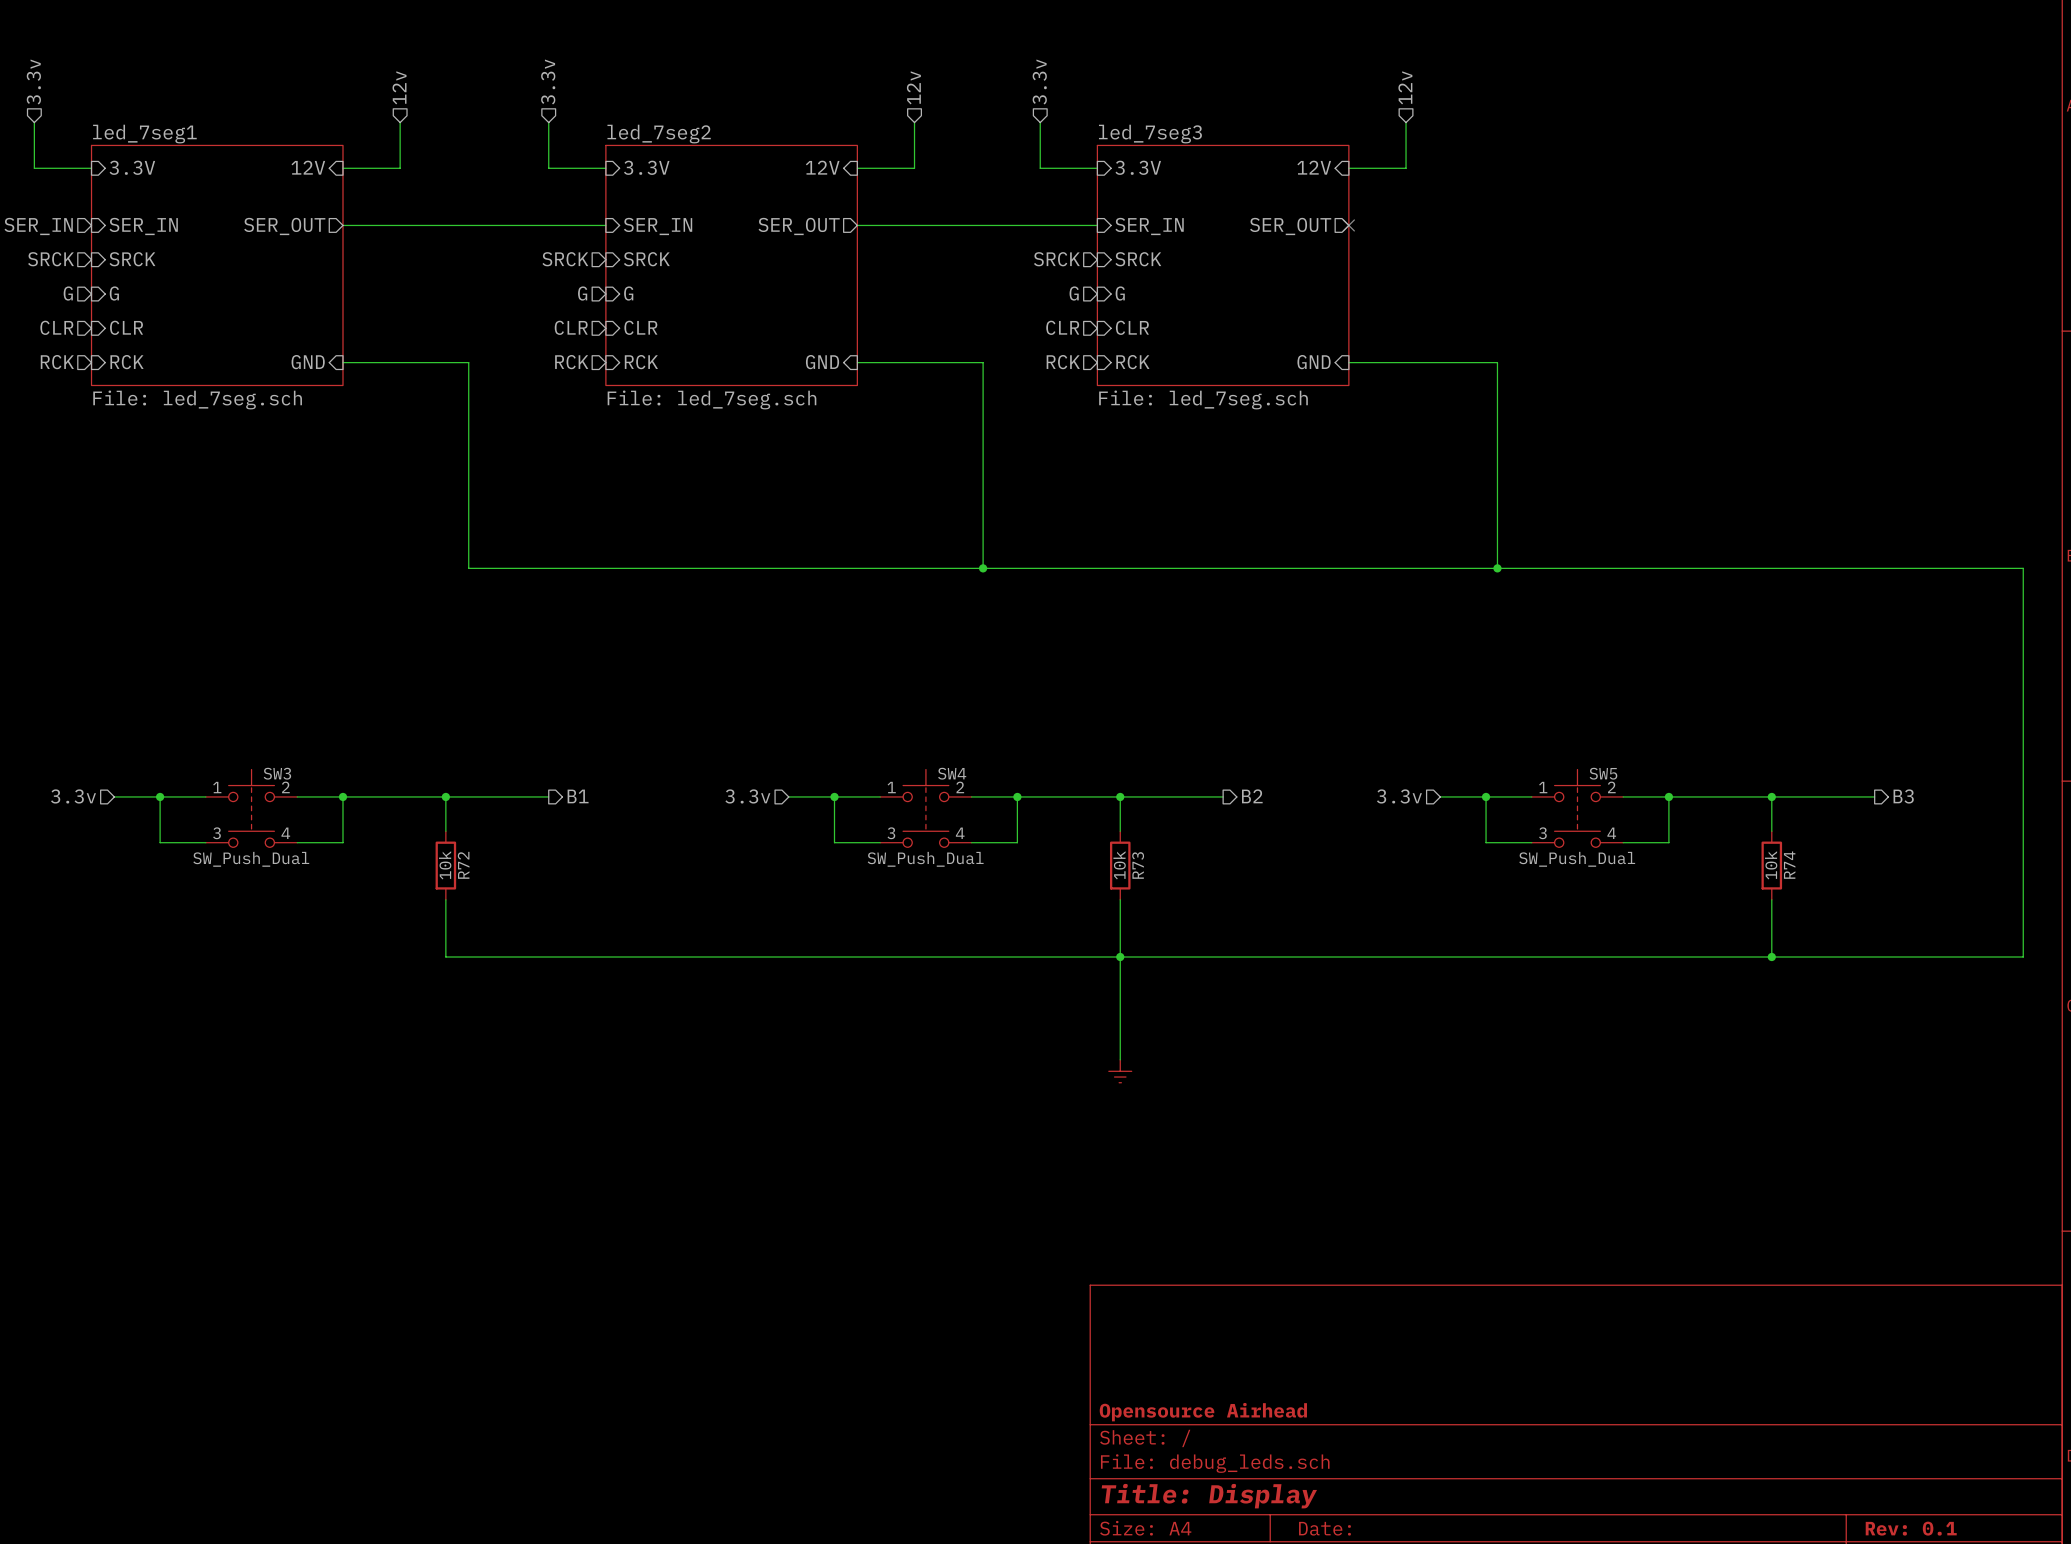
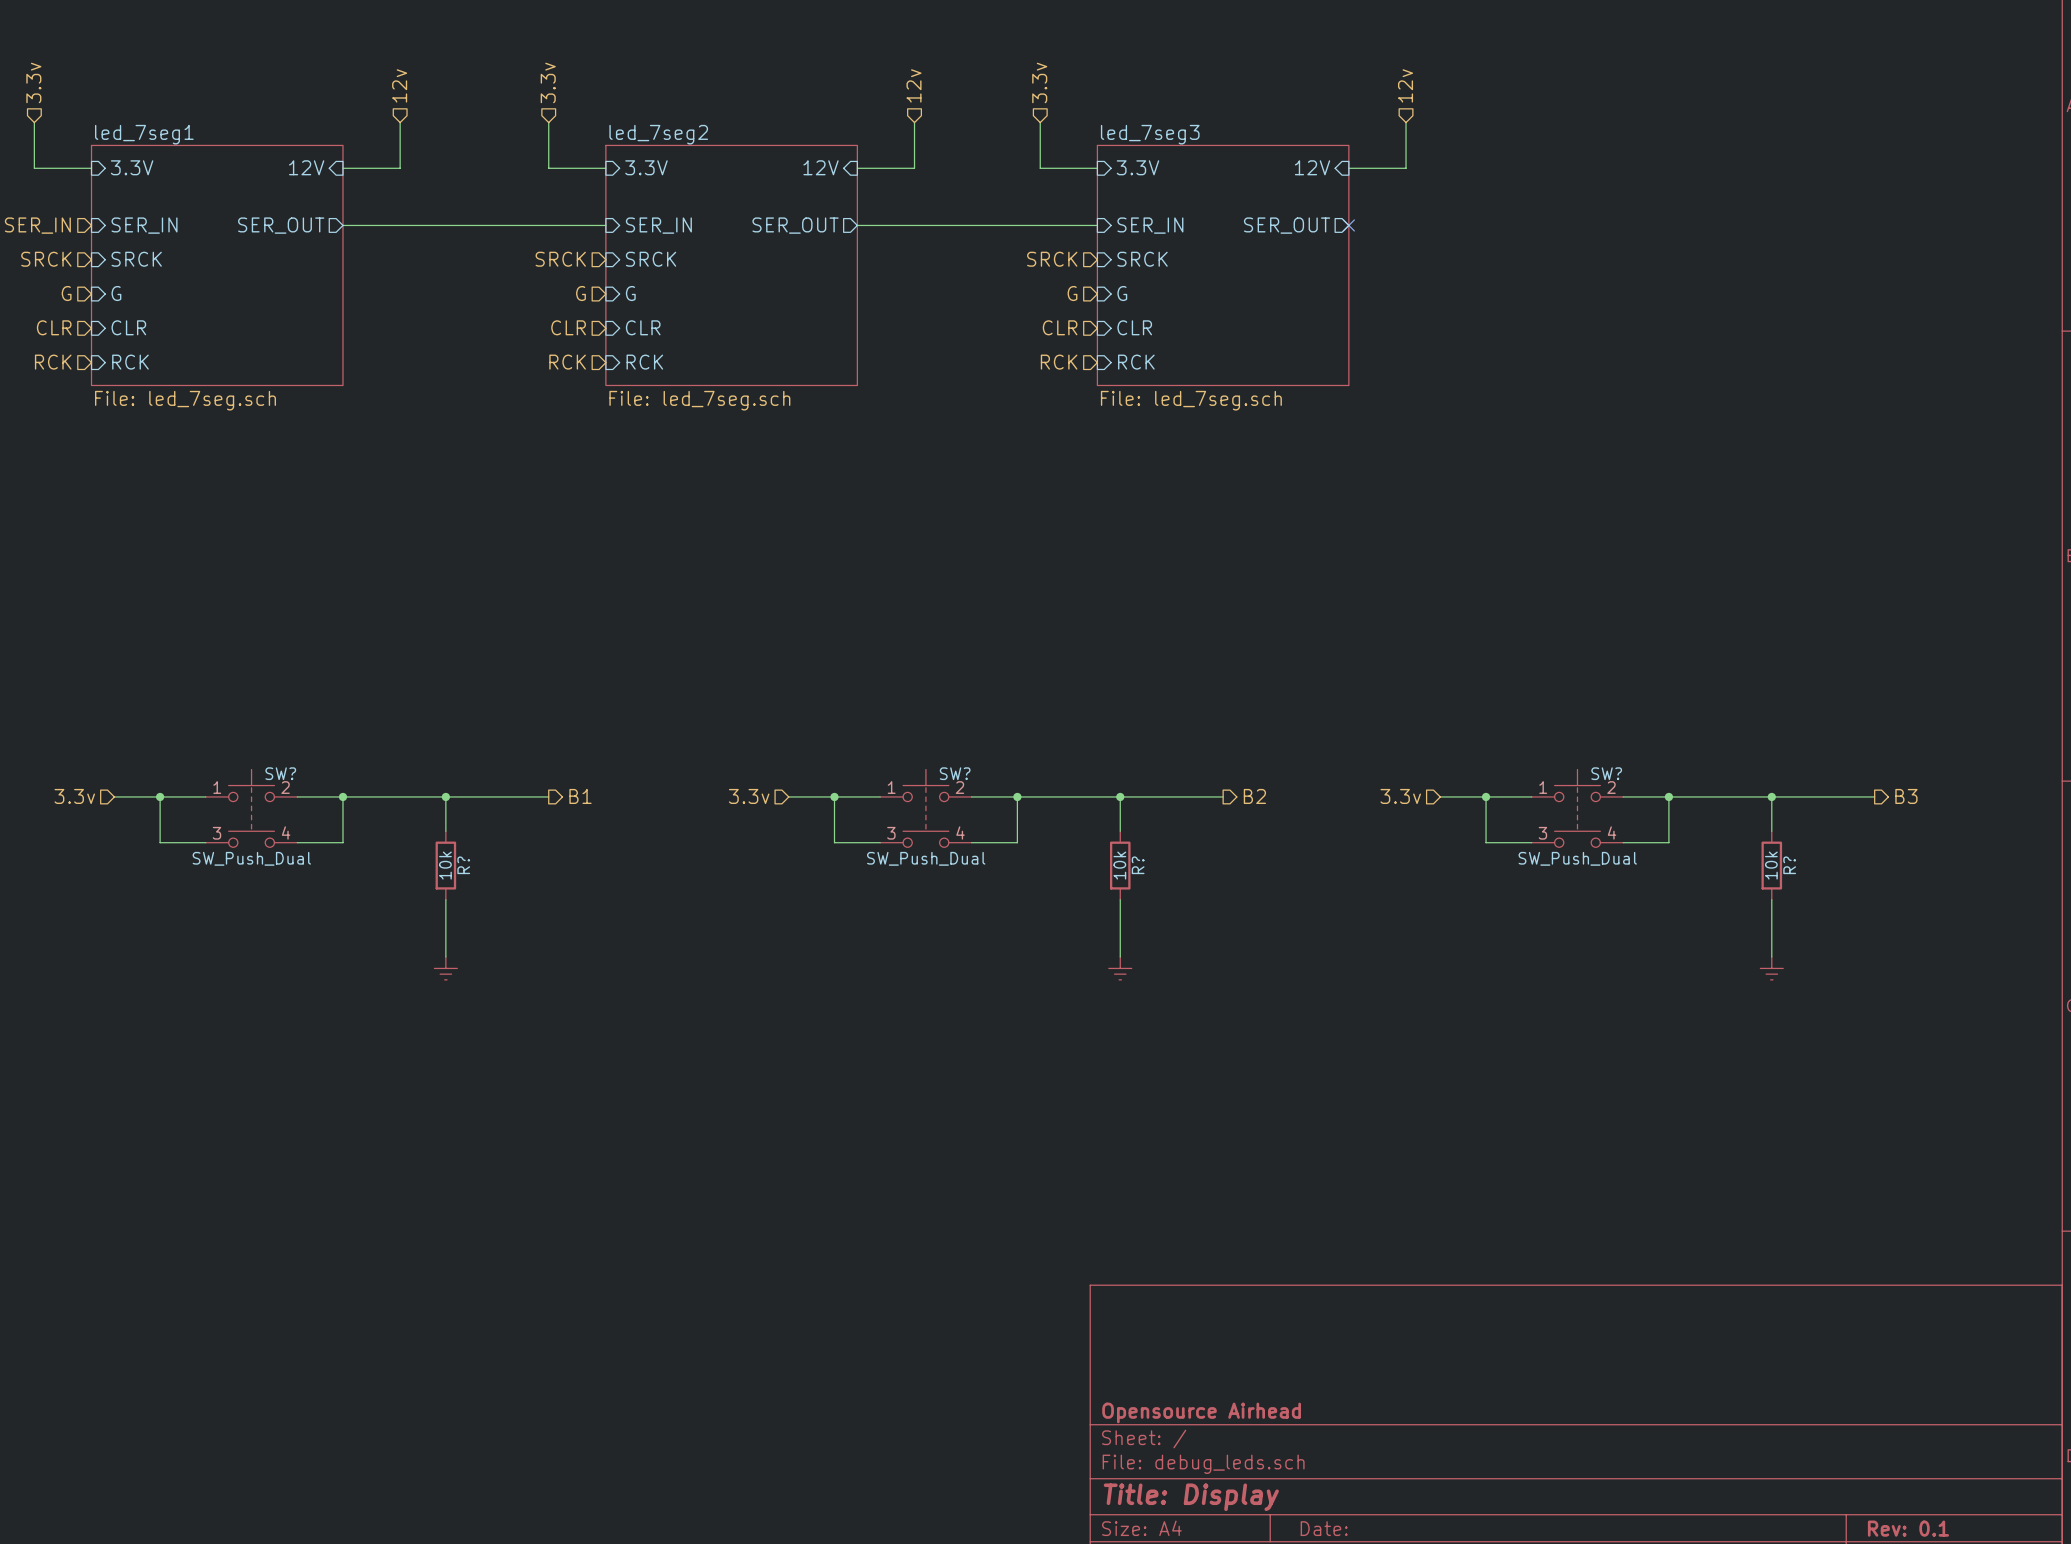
sheet pin: GND (308, 362) -> none
wire: (342, 362) (468, 362) (468, 568) (2023, 568) (2023, 957) (445, 957) -> none
sheet pin: GND (822, 362) -> none
wire: (857, 362) (983, 362) (983, 568) -> none
sheet pin: GND (1314, 362) -> none
wire: (1348, 362) (1497, 362) (1497, 568) -> none
junction: (983, 568) -> none
junction: (1497, 568) -> none
SW3 name: SW3 (277, 773) -> SW? (280, 773)
SW4 name: SW4 (952, 773) -> SW? (955, 773)
SW5 name: SW5 (1603, 773) -> SW? (1606, 773)
R72 name: R72 (463, 865) -> R? (463, 865)
R73 name: R73 (1138, 865) -> R? (1138, 865)
R74 name: R74 (1789, 865) -> R? (1789, 865)
wire: (1120, 957) (1120, 1059) -> none
junction: (1120, 957) -> none
junction: (1771, 957) -> none
power symbol: none -> (445, 968)
power symbol: none -> (1771, 968)
power symbol position: (1120, 1071) -> (1120, 968)

